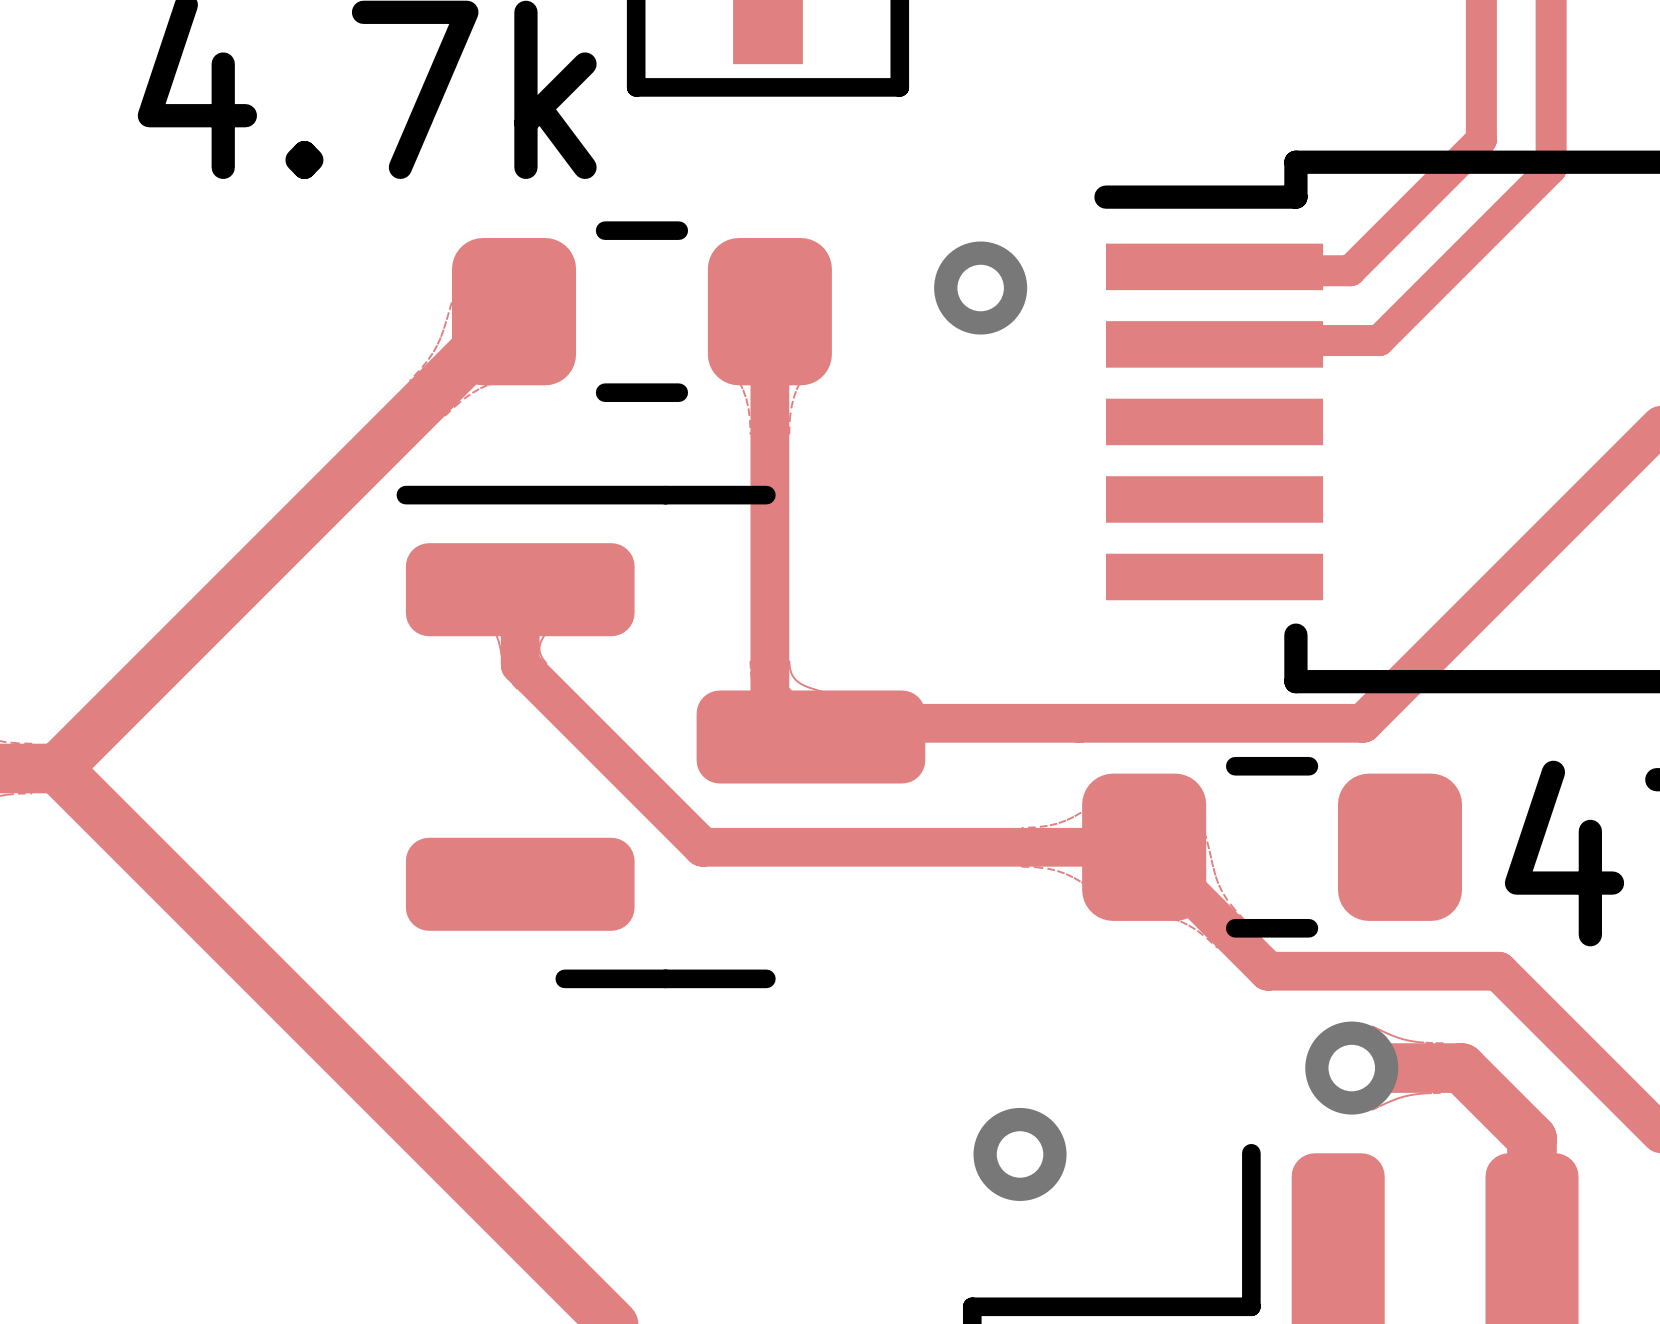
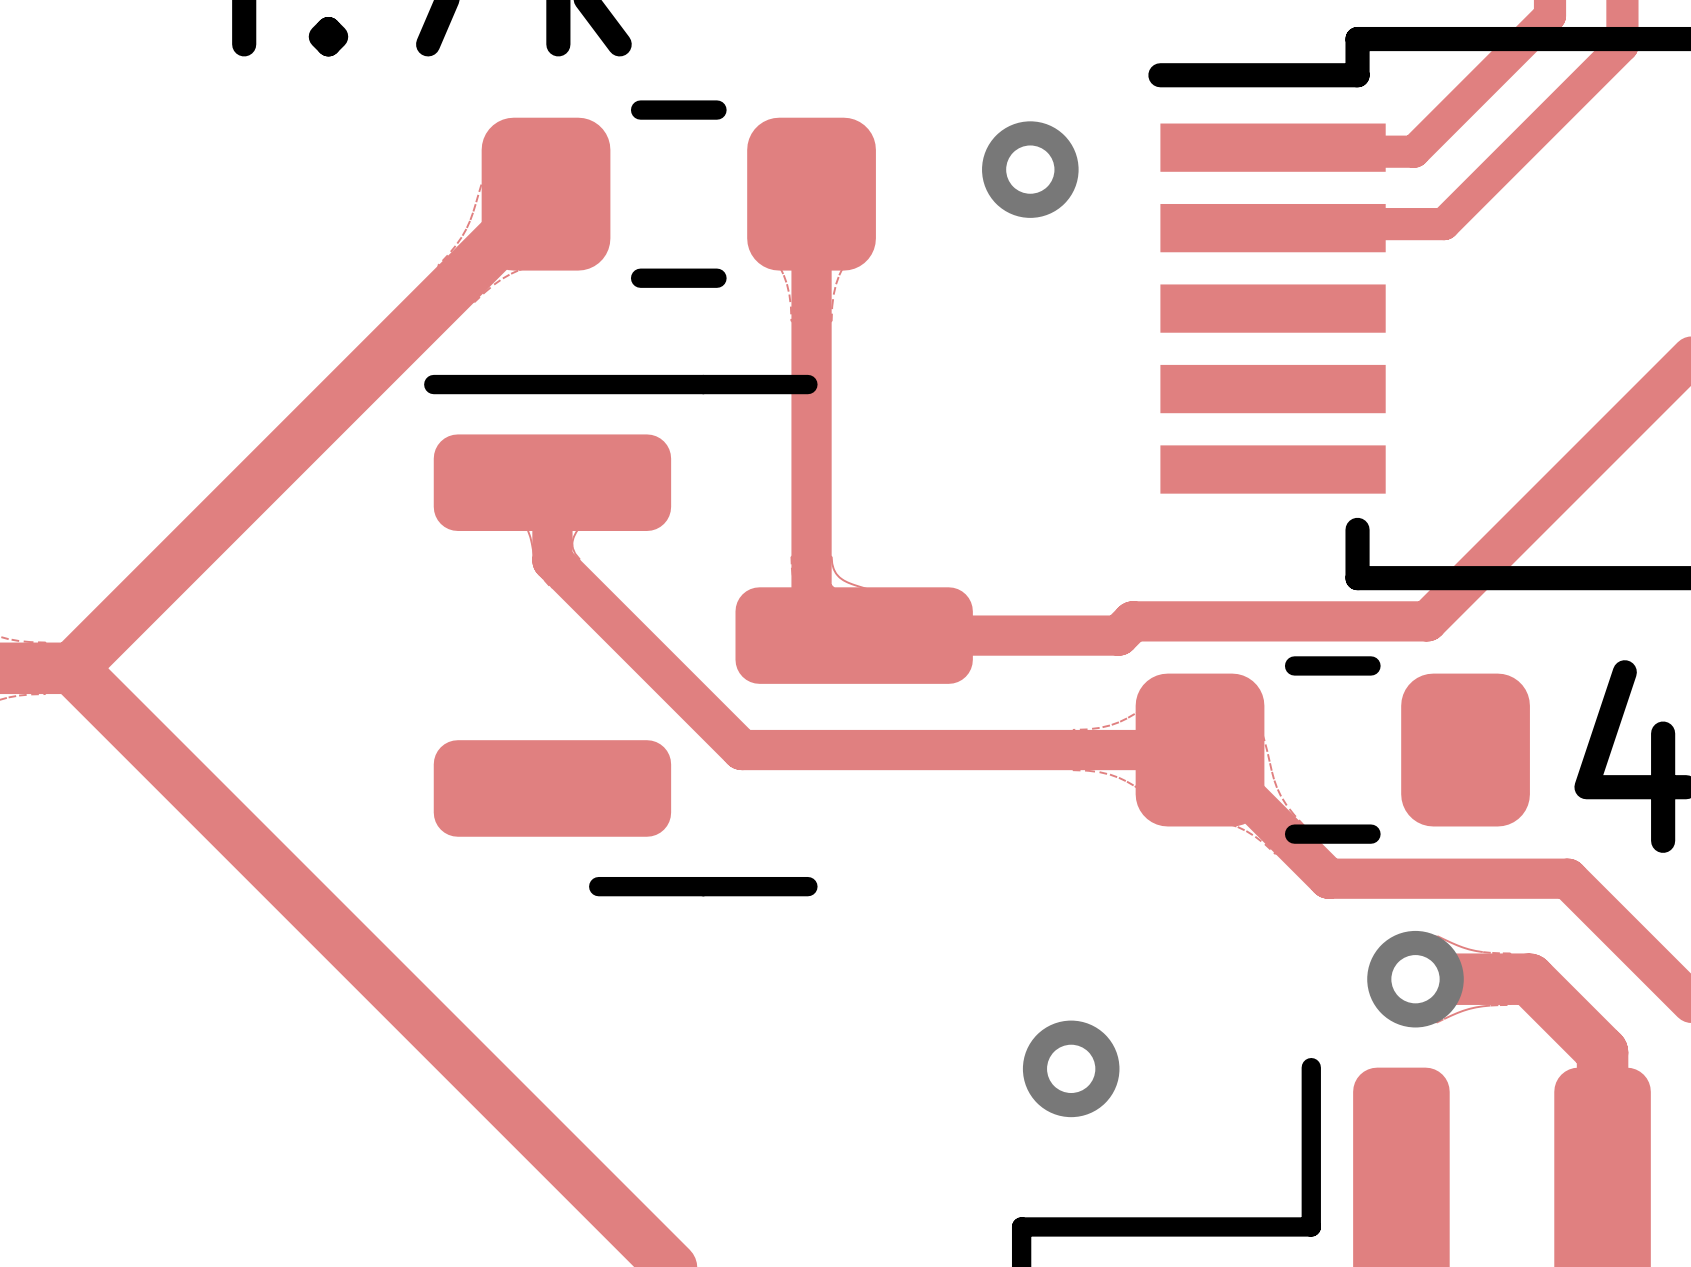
track: (824, 723) (1079, 723) -> (868, 621) (854, 635) (1118, 635) (1132, 621)

